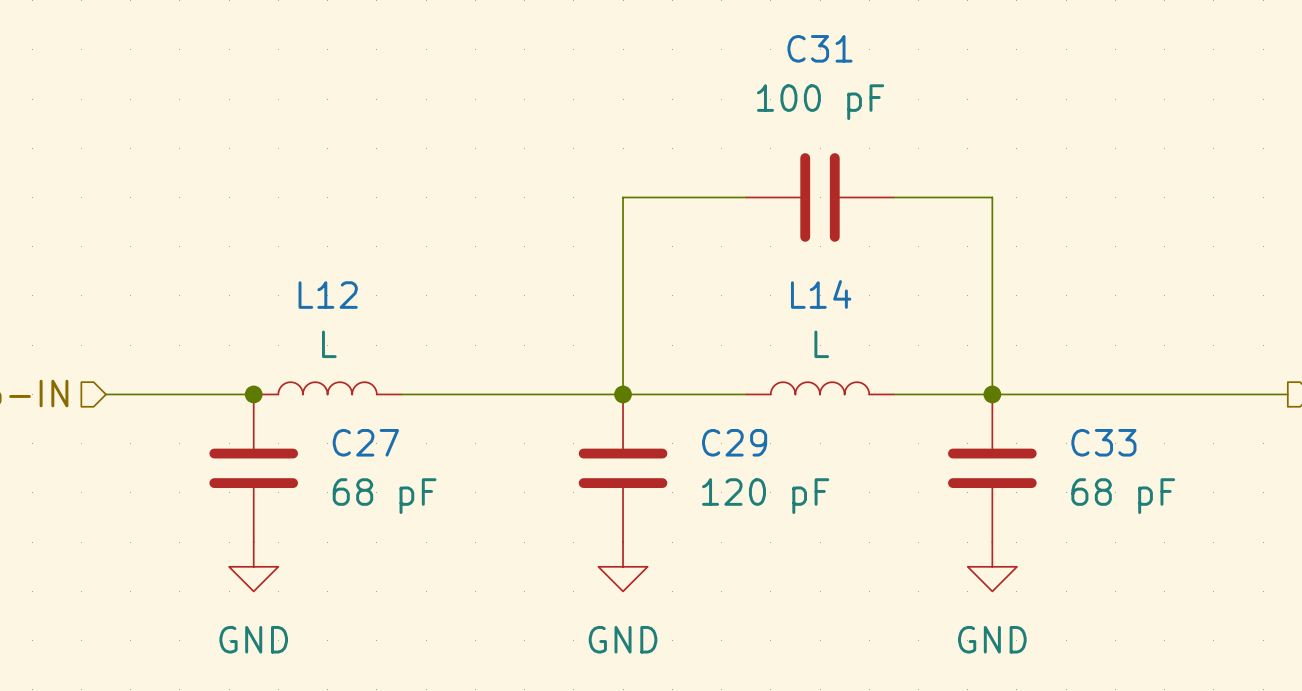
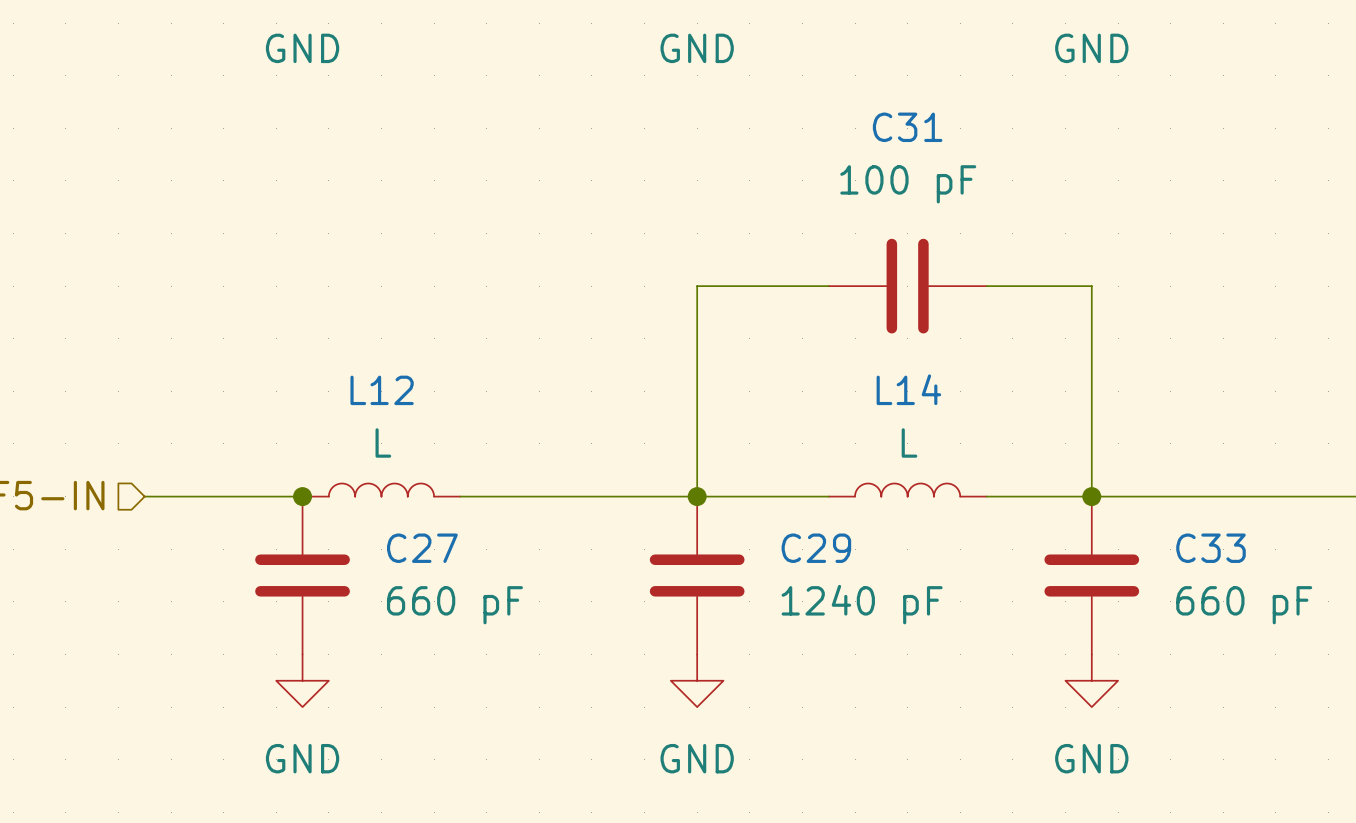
C27 value: 68 pF (384, 496) -> 660 pF (454, 605)
C29 value: 120 pF (765, 496) -> 1240 pF (862, 604)
C33 value: 68 pF (1123, 496) -> 660 pF (1244, 605)

